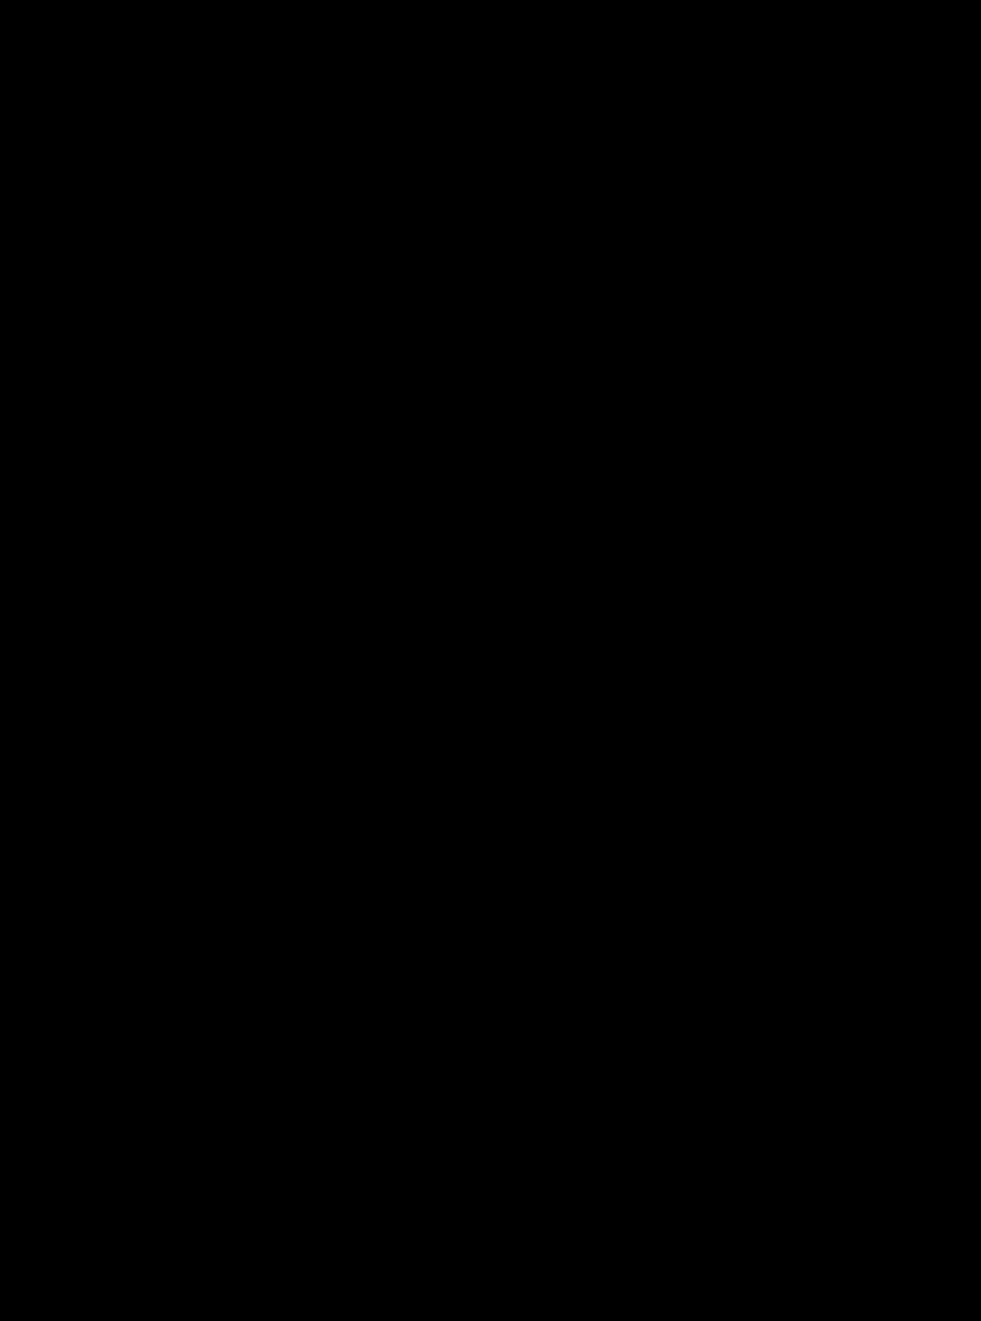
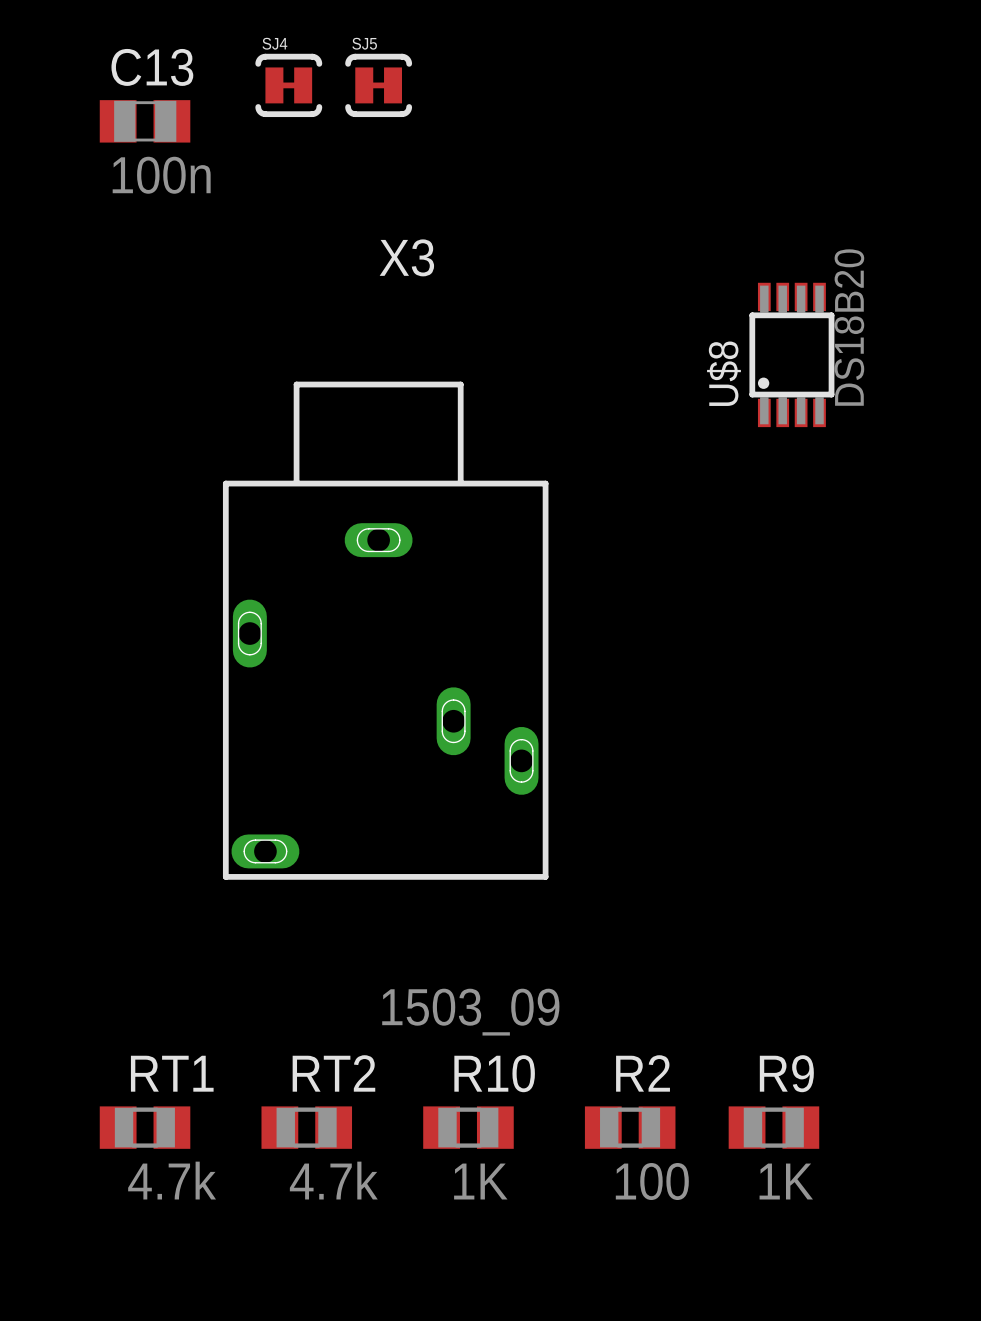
SJ4: none -> (288, 85)
SJ5: none -> (378, 85)
C13: none -> 100n (145, 121)
U$8: none -> DS18B20 (791, 354)
X3: none -> 1503_09 (385, 630)
RT1: none -> 4.7k (145, 1127)
RT2: none -> 4.7k (306, 1127)
R10: none -> 1K (468, 1127)
R2: none -> 100 (630, 1127)
R9: none -> 1K (773, 1127)

